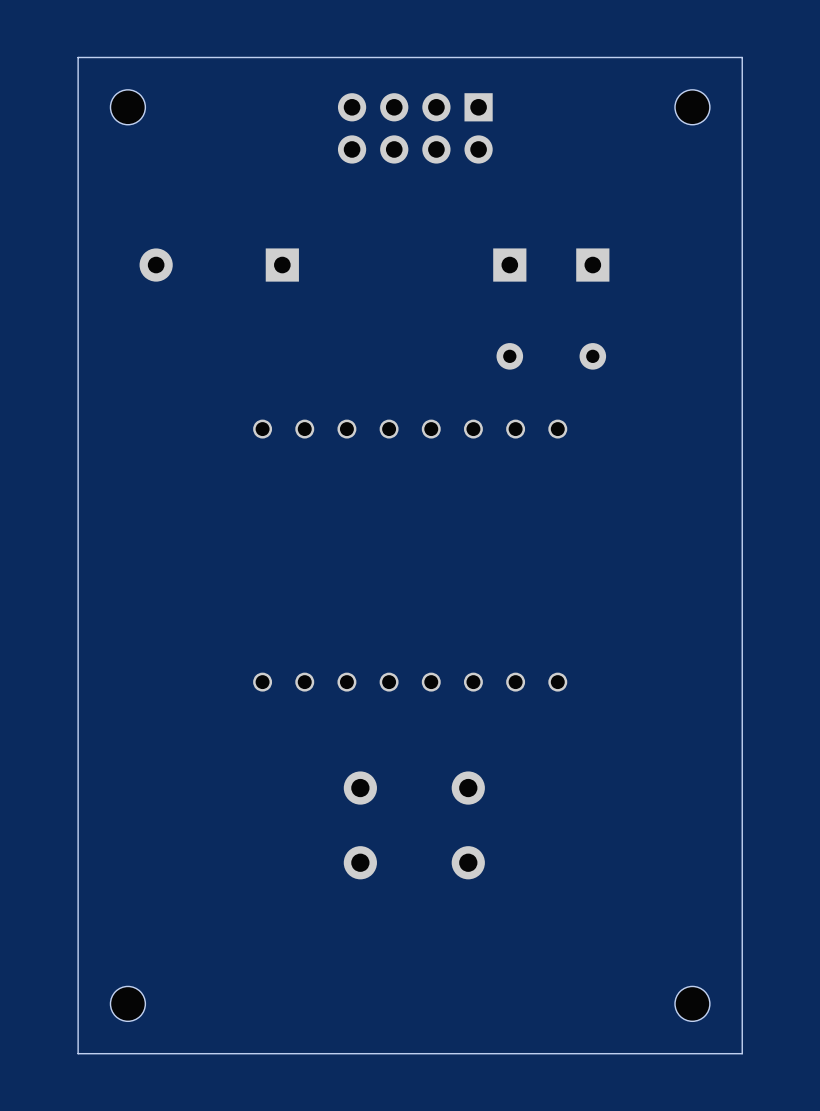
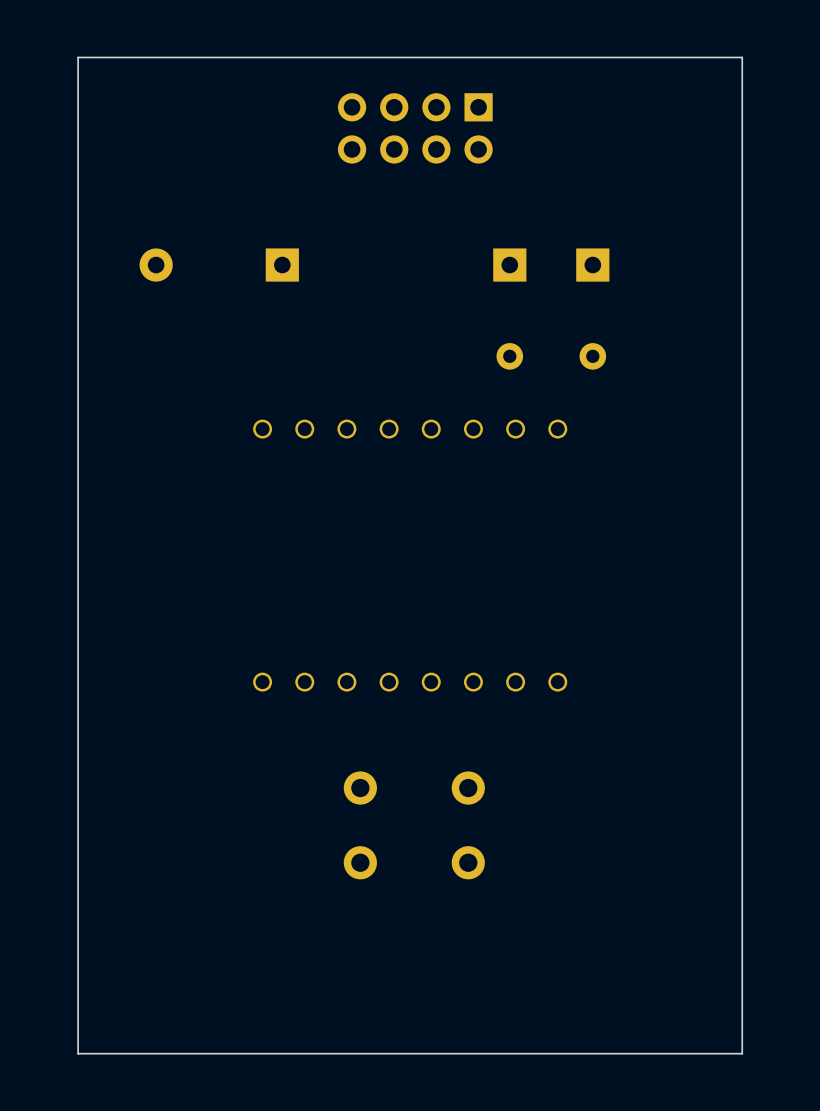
part: (127, 107) -> none
part: (692, 107) -> none
part: (127, 1003) -> none
part: (692, 1003) -> none

